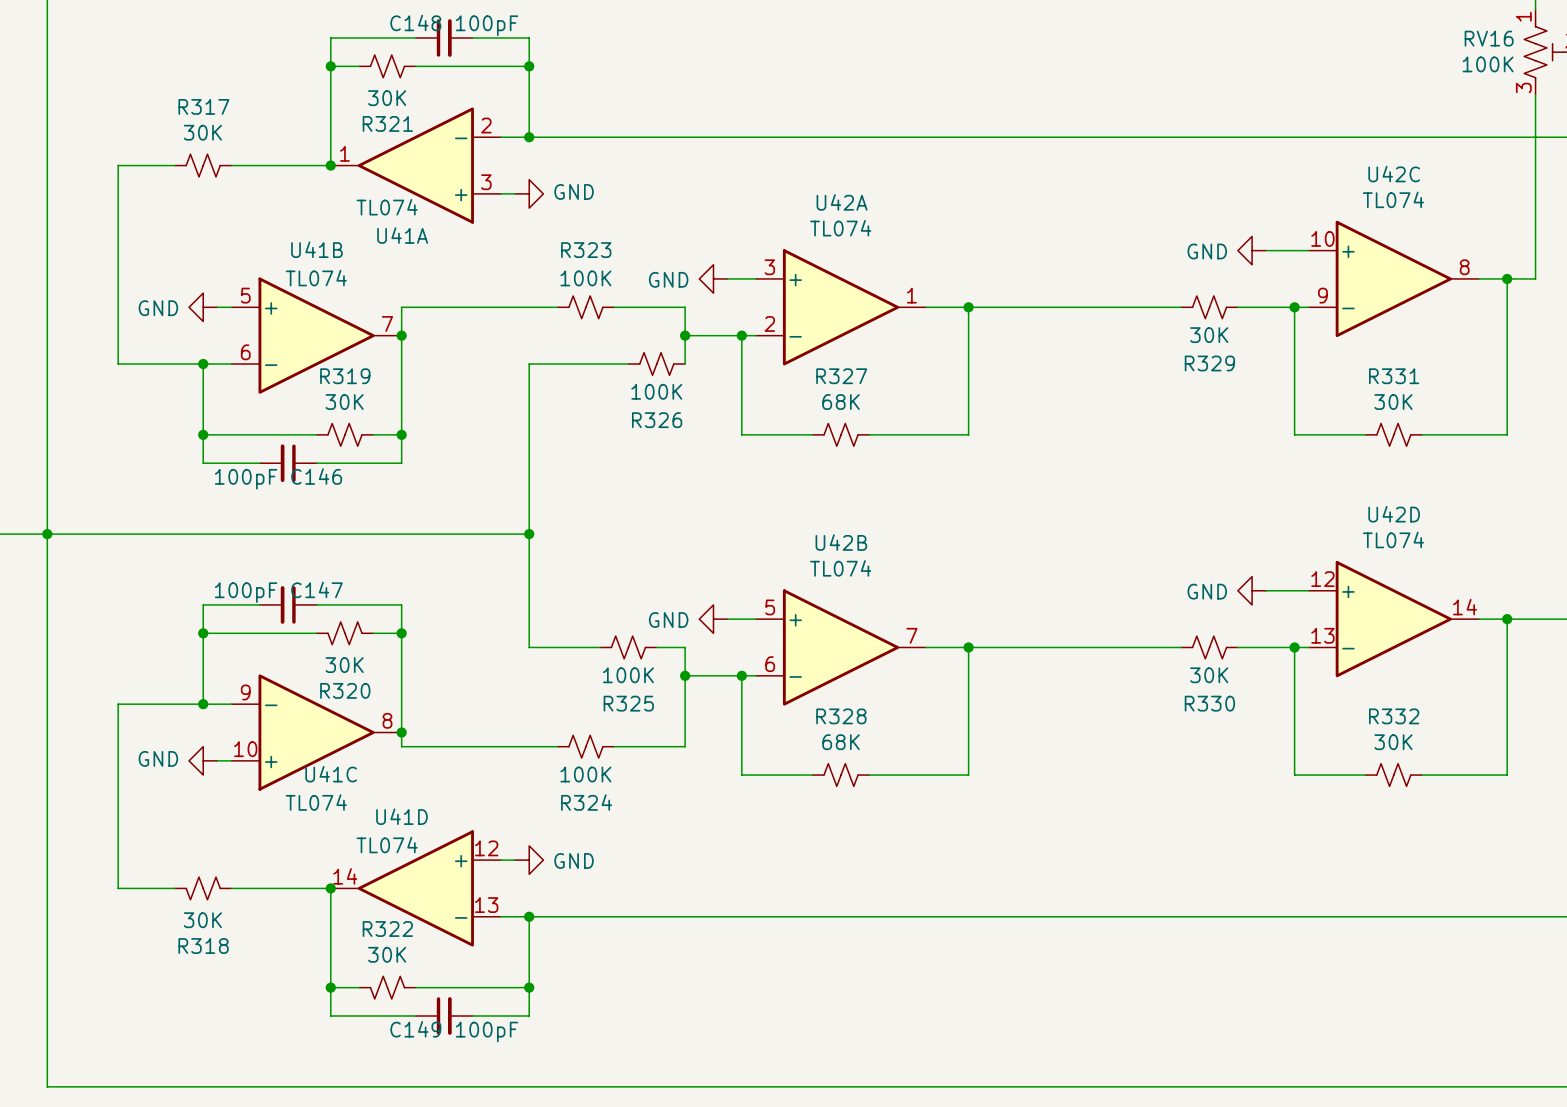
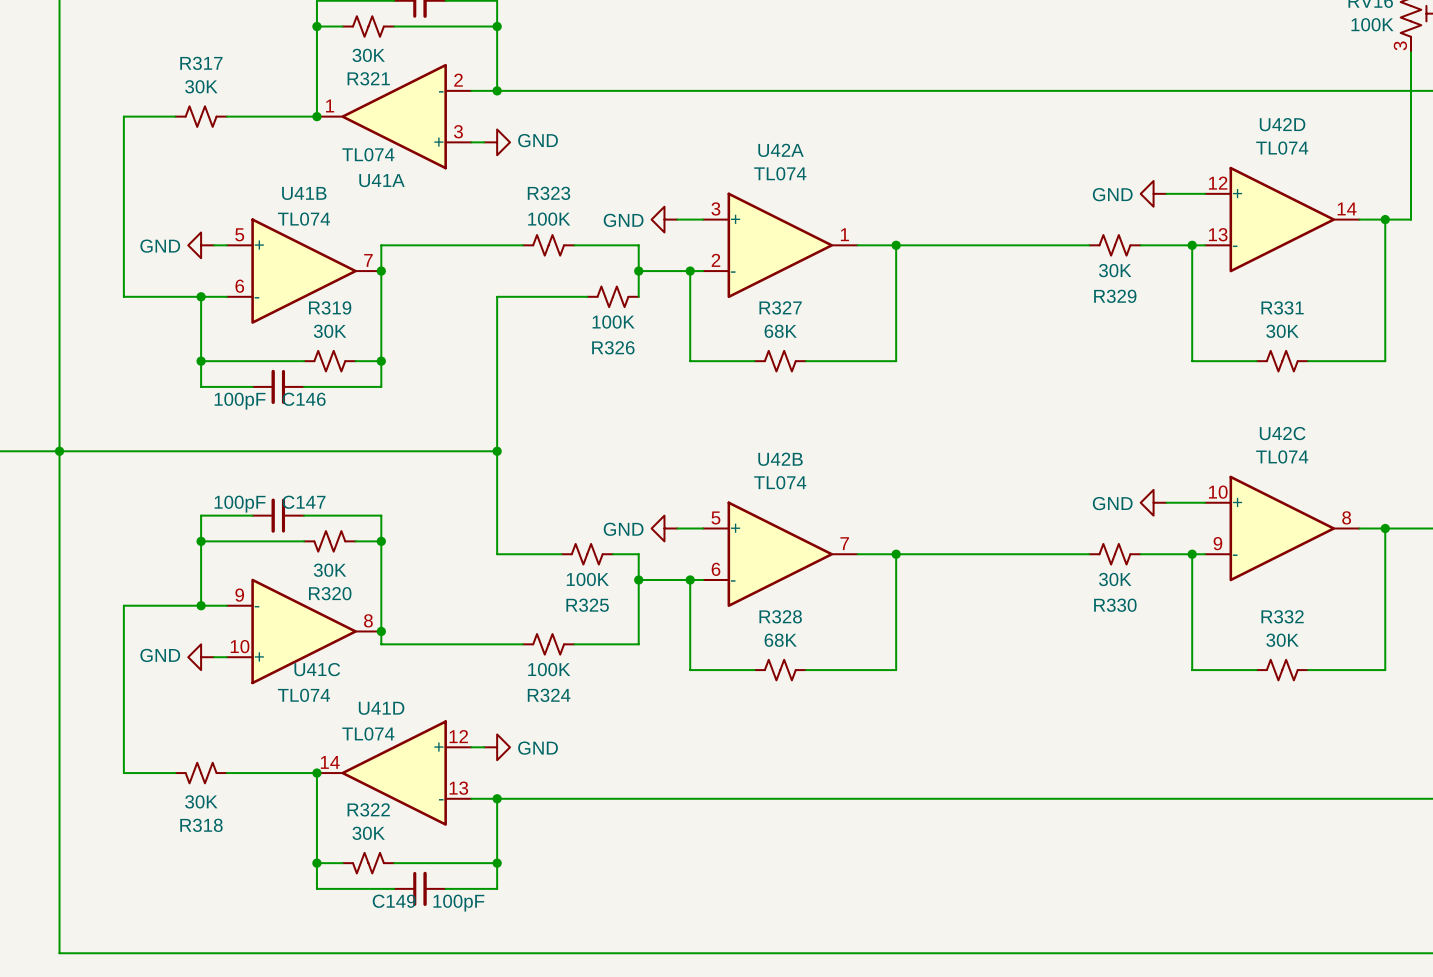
U42C position: (1393, 278) -> (1282, 528)
U42D position: (1393, 619) -> (1282, 219)

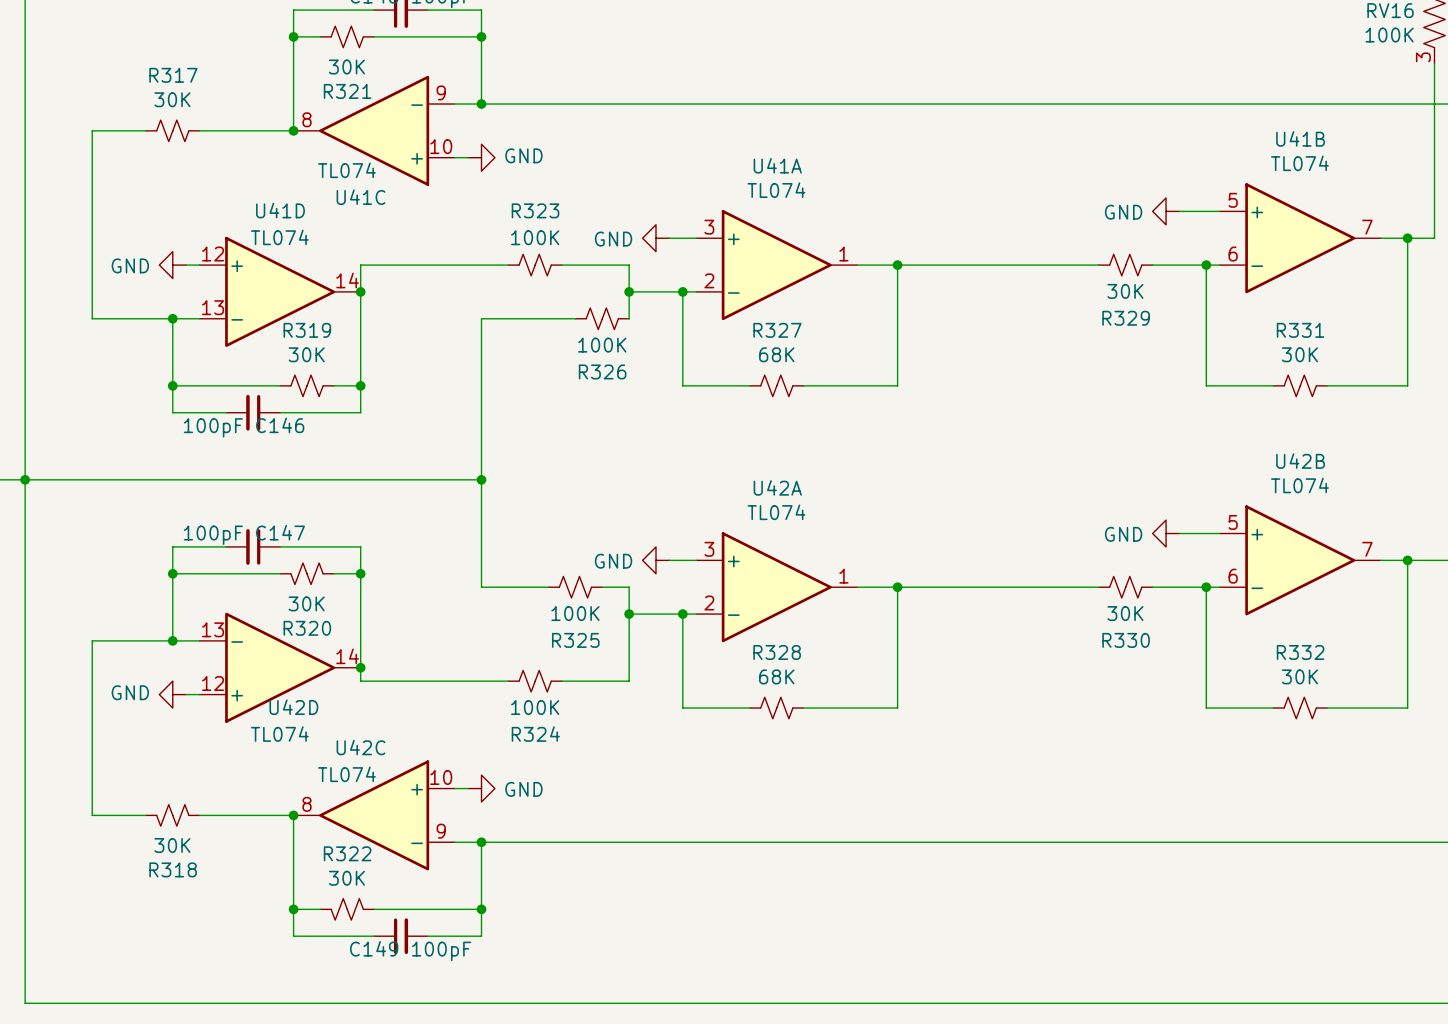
U41A: TL074 (394, 116) -> none
U42D name position: U42D (1282, 124) -> U42D (293, 707)
U42A name: U42A (781, 150) -> U41A (777, 165)
U41B name position: U41B (304, 193) -> U41B (1300, 138)
U42D flip: as is (1282, 219) -> up-down (280, 667)
U42D position: (1282, 219) -> (280, 667)
U41B position: (304, 271) -> (1300, 238)
U42C name position: U42C (1282, 433) -> U42C (361, 747)
U42C flip: as is (1282, 528) -> left-right (374, 815)
U42C position: (1282, 528) -> (374, 815)
U42B position: (780, 554) -> (1300, 560)
U42A: none -> TL074 (776, 587)
U41C flip: as is (304, 631) -> left-right (374, 130)
U41C position: (304, 631) -> (374, 130)
U41C name position: U41C (317, 669) -> U41C (361, 197)
U41D flip: as is (394, 773) -> left-right (280, 291)
U41D position: (394, 773) -> (280, 291)

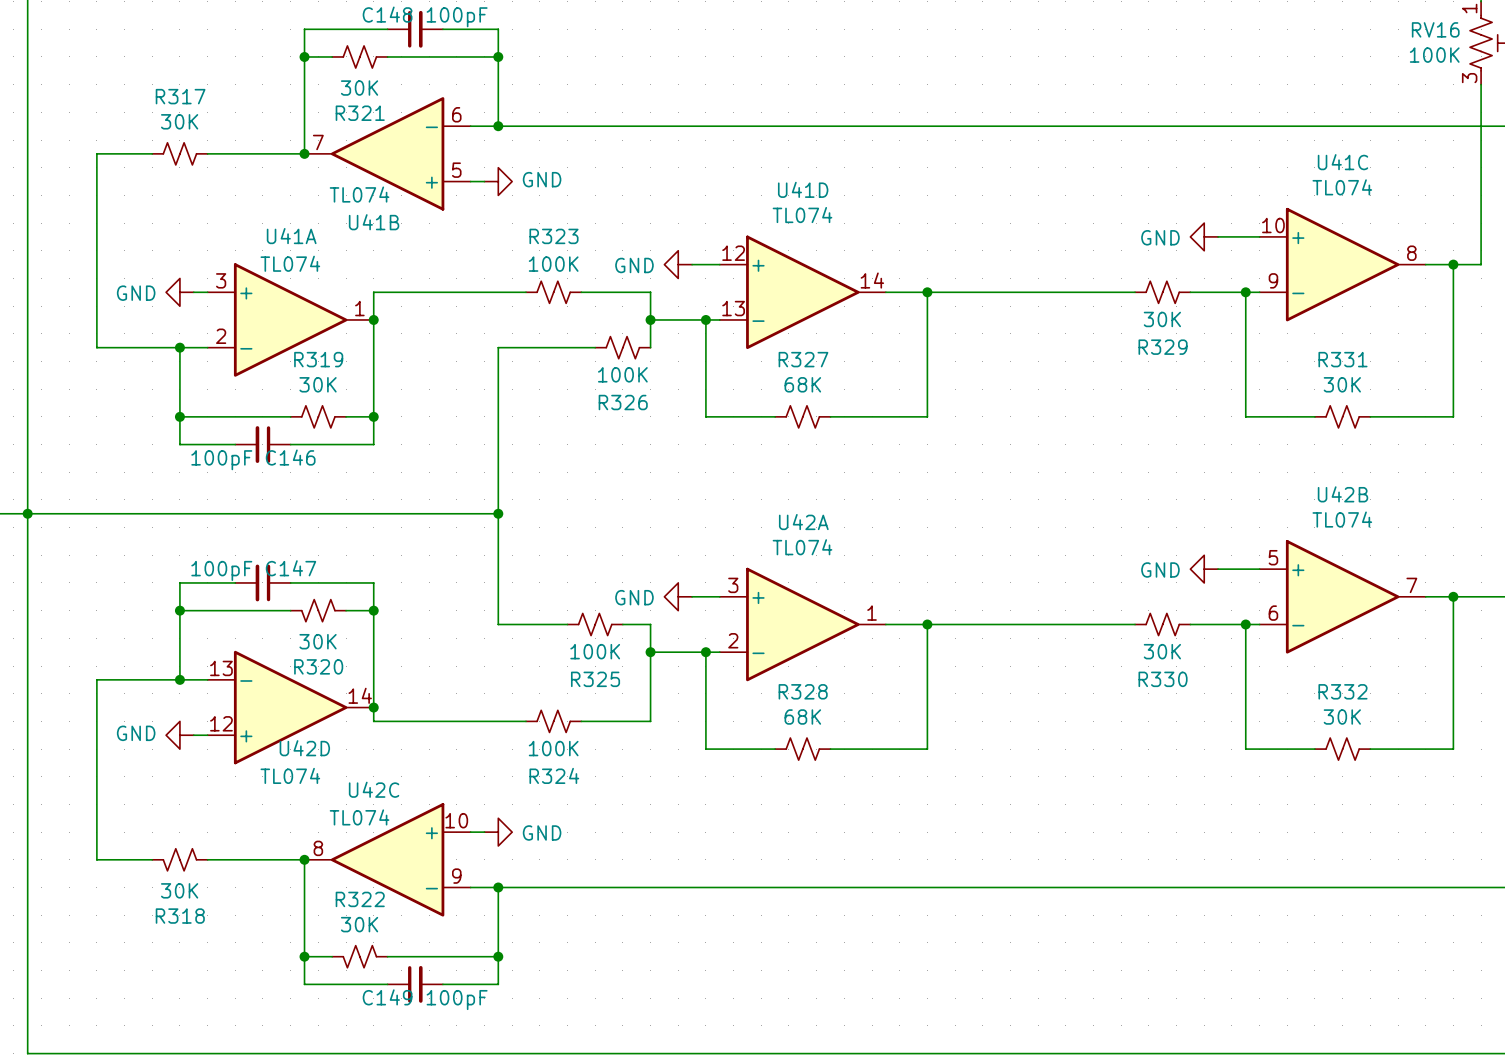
U41C rotation: 0° (374, 130) -> 180° (1342, 264)
U41C position: (374, 130) -> (1342, 264)
U41B name position: U41B (1300, 138) -> U41B (374, 222)
U41A name position: U41A (777, 165) -> U41A (291, 236)
U41C name position: U41C (361, 197) -> U41C (1342, 162)
U41D name position: U41D (280, 210) -> U41D (803, 189)
U41B rotation: 0° (1300, 238) -> 180° (387, 153)
U41B position: (1300, 238) -> (387, 153)
U41A position: (776, 265) -> (290, 319)
U41D position: (280, 291) -> (802, 292)

